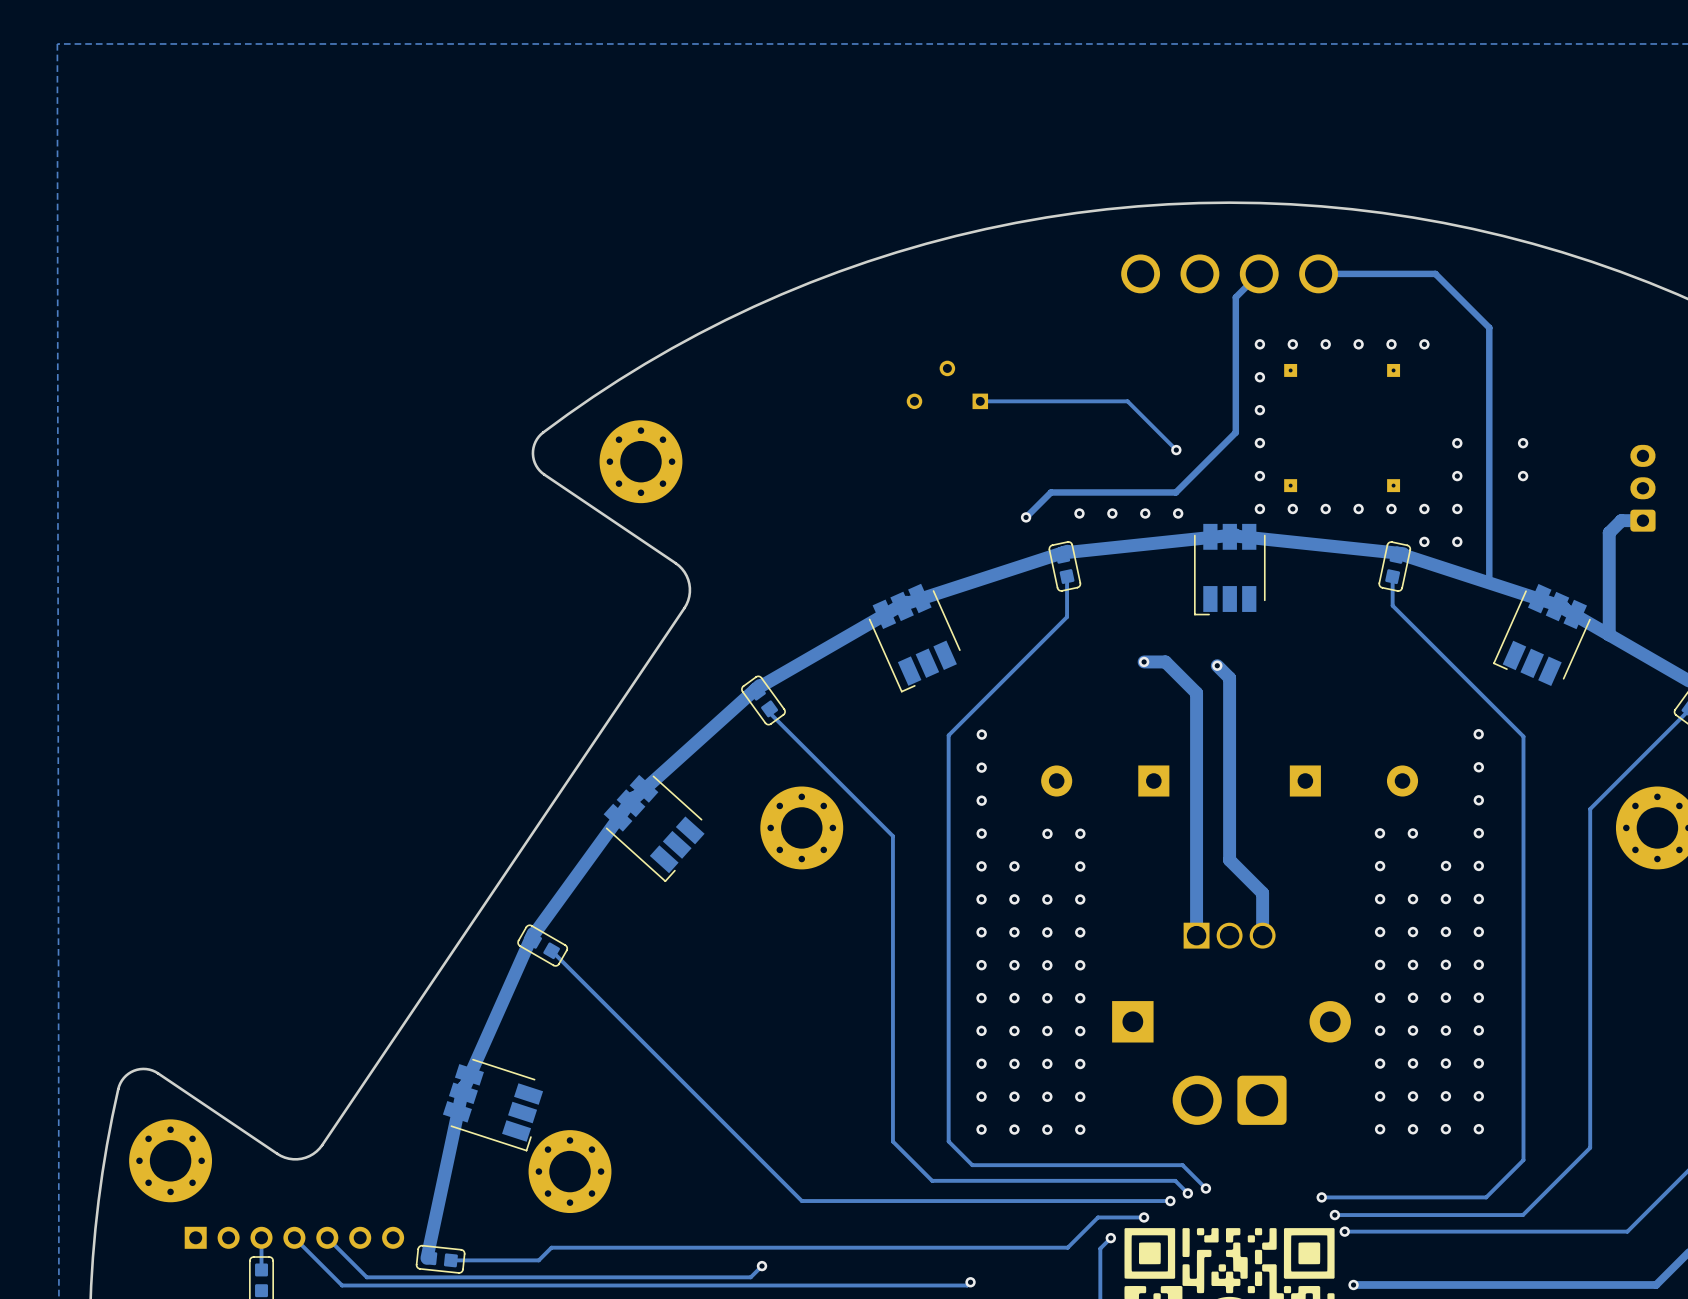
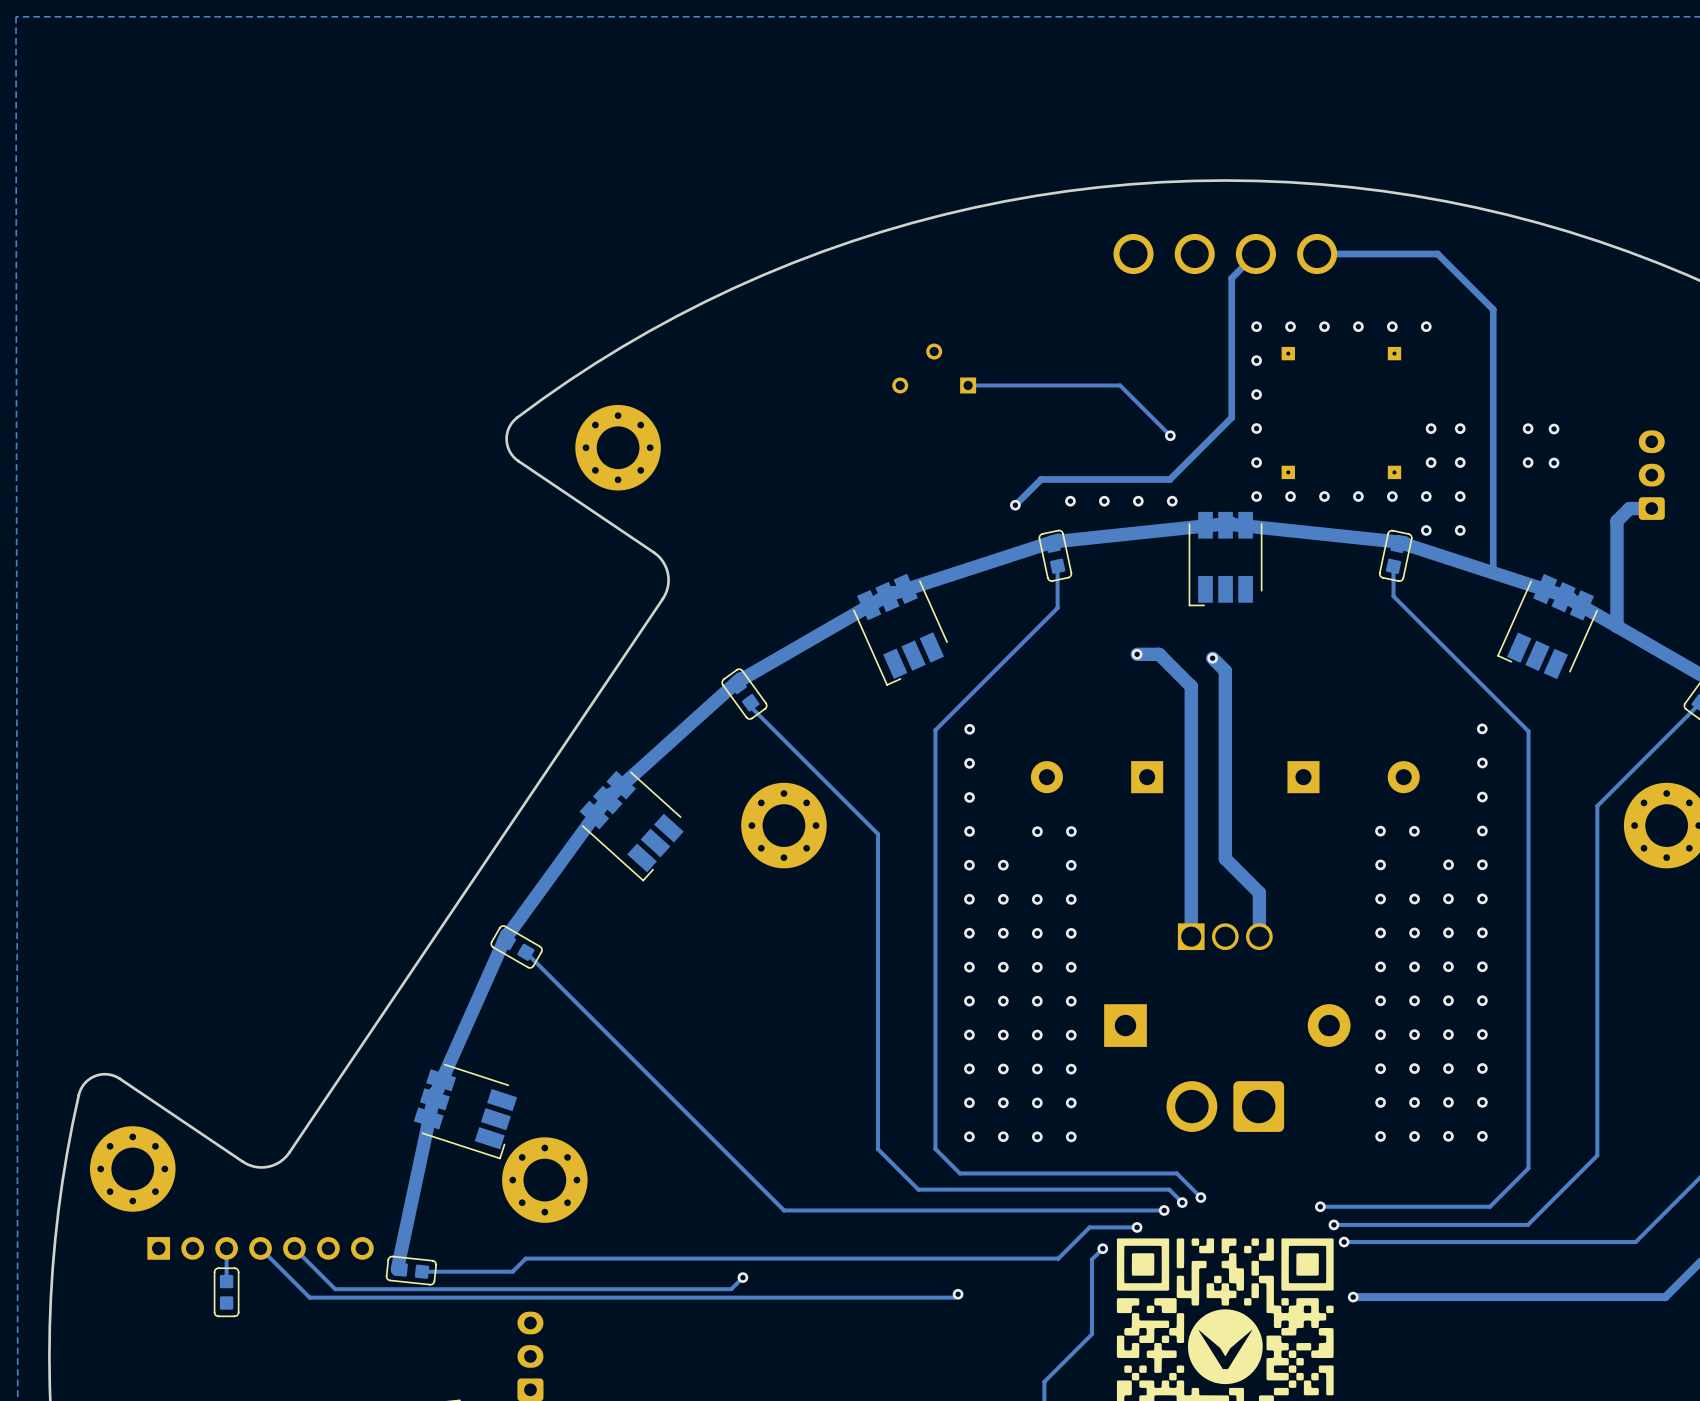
via: none -> (1431, 428)
via: none -> (1554, 429)
via: none -> (1431, 462)
via: none -> (1554, 462)

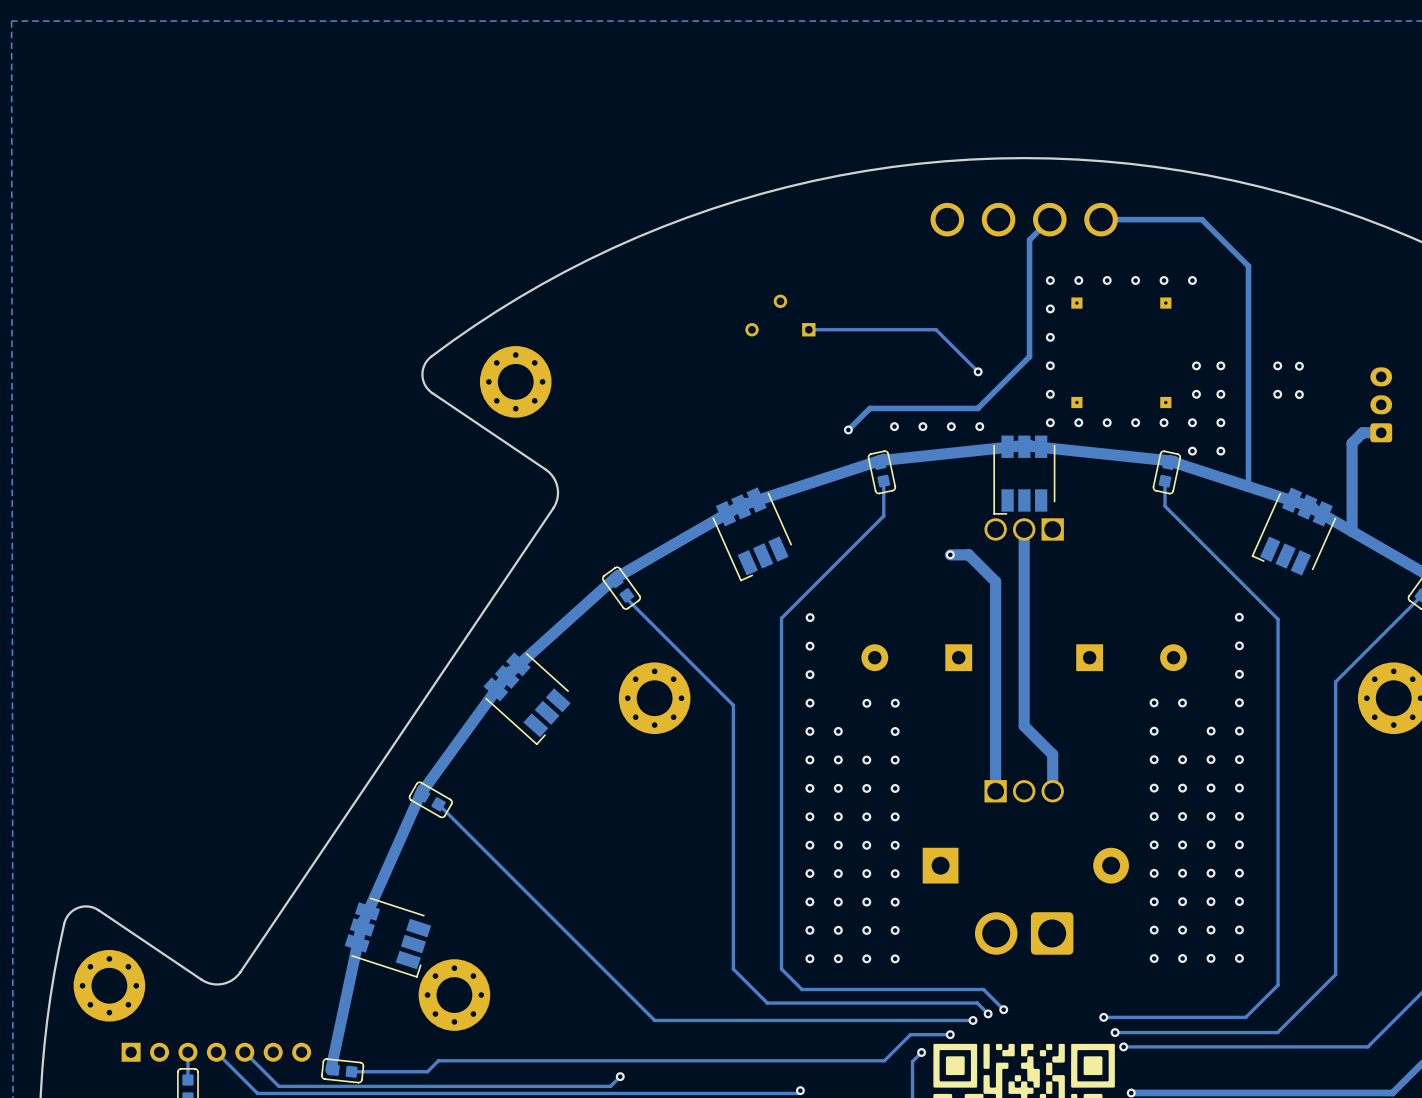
part: none -> (1024, 529)
track: (1212, 658) (1225, 670) -> (1024, 529) (1024, 568)
via: (1212, 658) -> none

